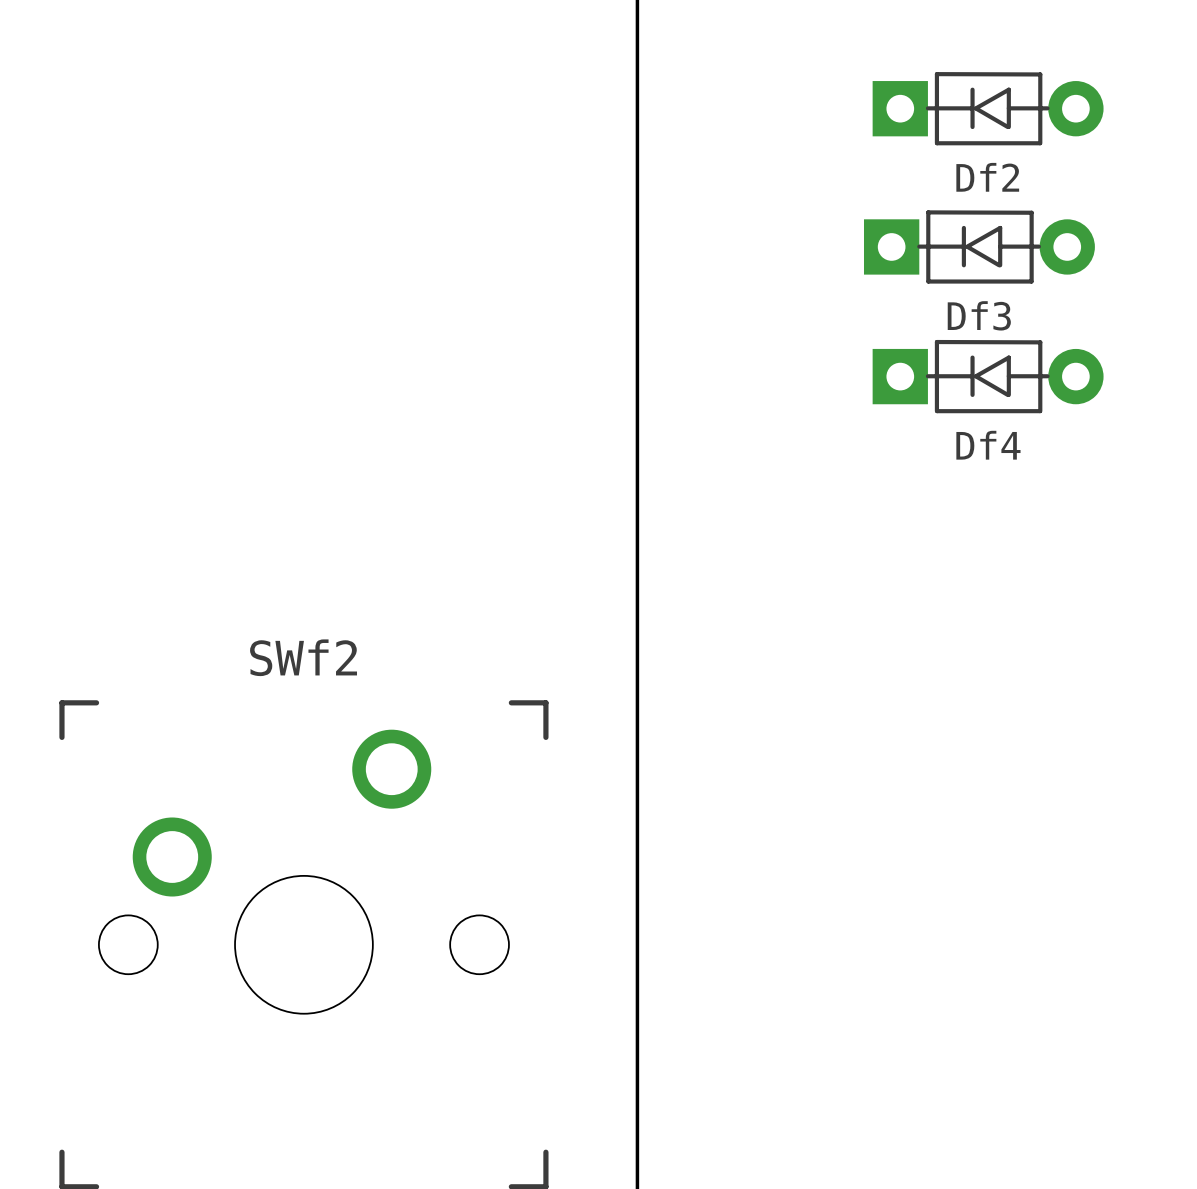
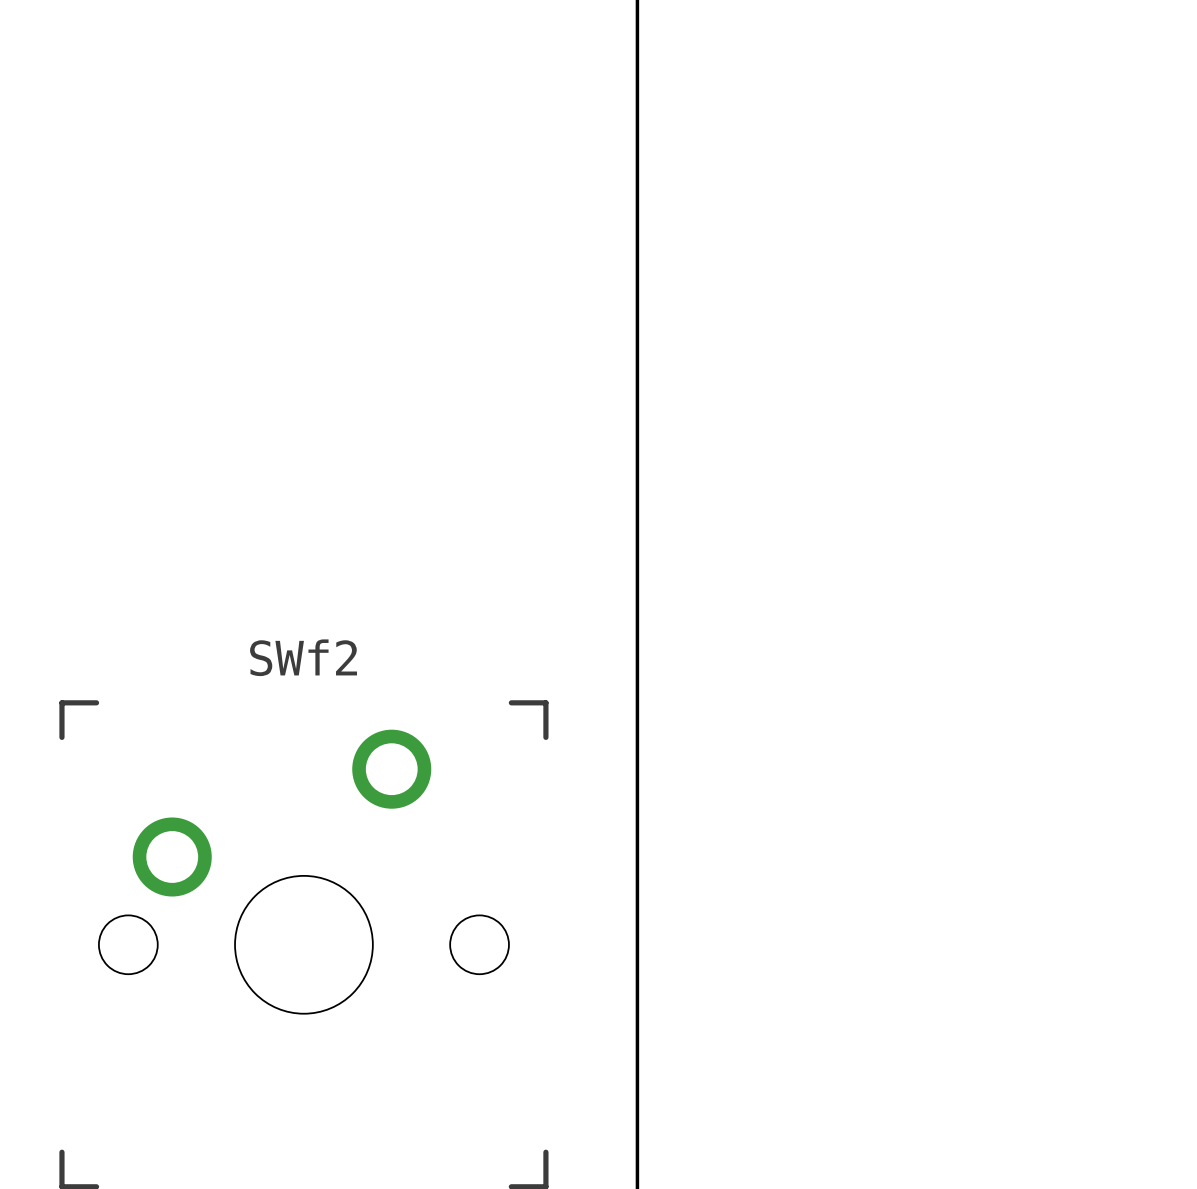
Df2: (988, 108) -> none
Df3: (979, 246) -> none
Df4: (988, 376) -> none

